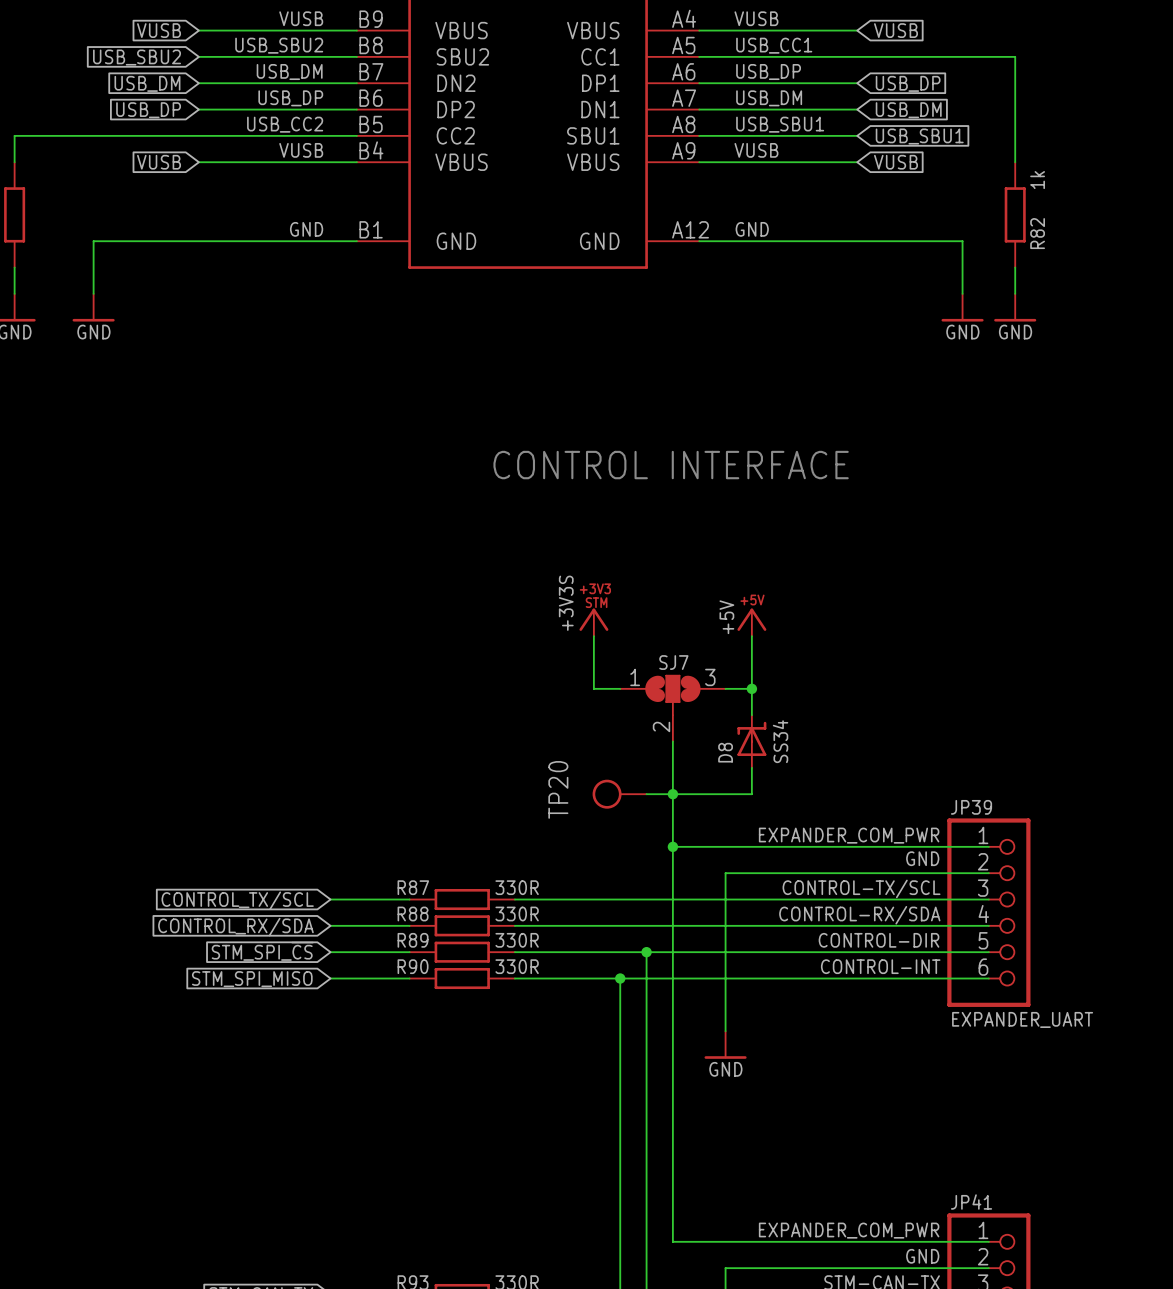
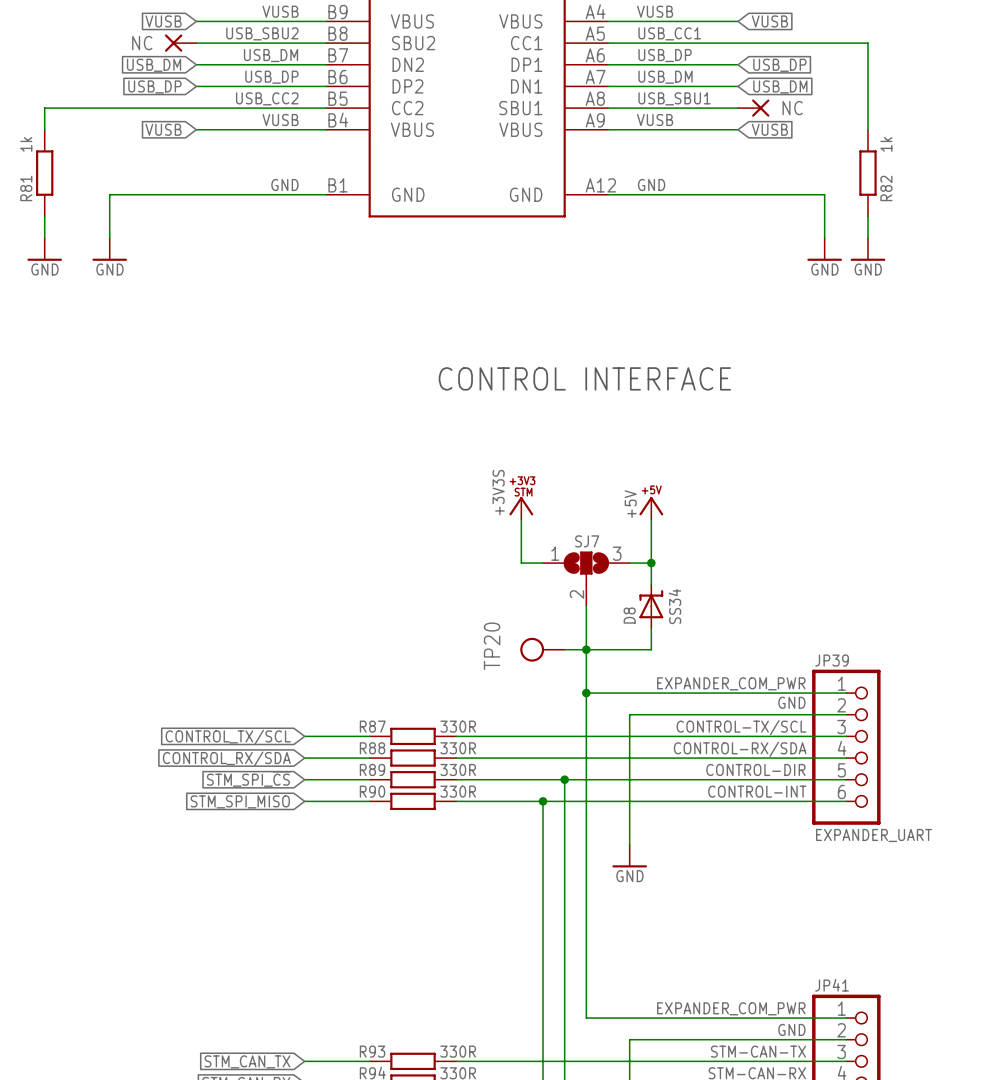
part: none -> (180, 43)
global label: USB_SBU2 (137, 57) -> none
part: none -> (753, 108)
global label: USB_SBU1 (919, 136) -> none

